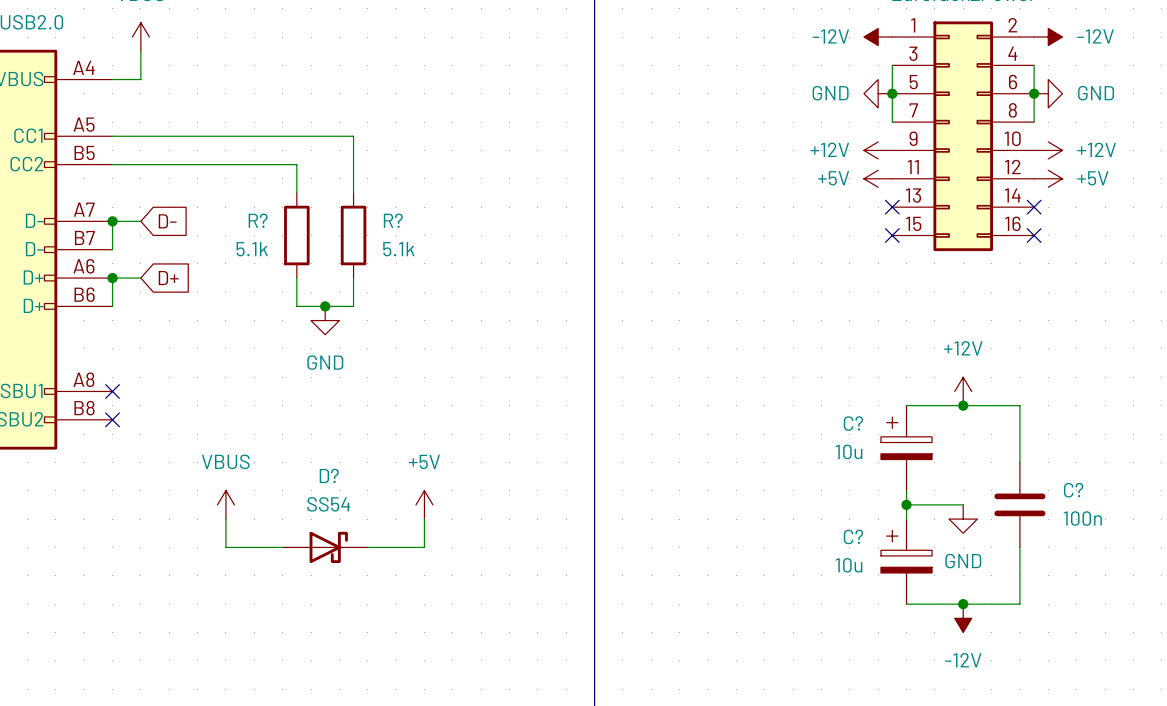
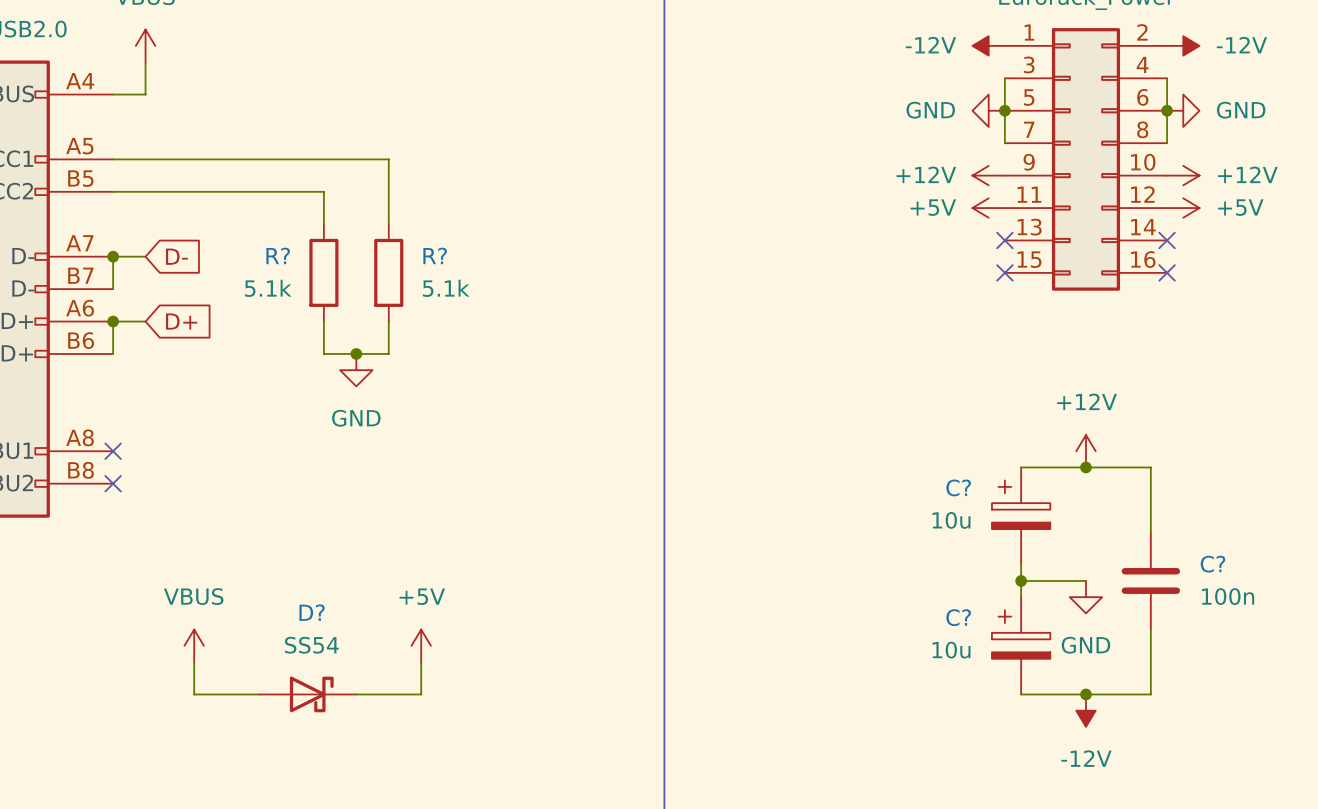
power symbol position: VBUS (225, 504) -> VBUS (194, 645)
power symbol position: +5V (424, 504) -> +5V (421, 645)
wire: (225, 519) (225, 547) (282, 547) -> (194, 662) (194, 694) (259, 694)
wire: (424, 519) (424, 547) (367, 547) -> (421, 662) (421, 694) (356, 694)
D? position: (325, 547) -> (307, 694)

